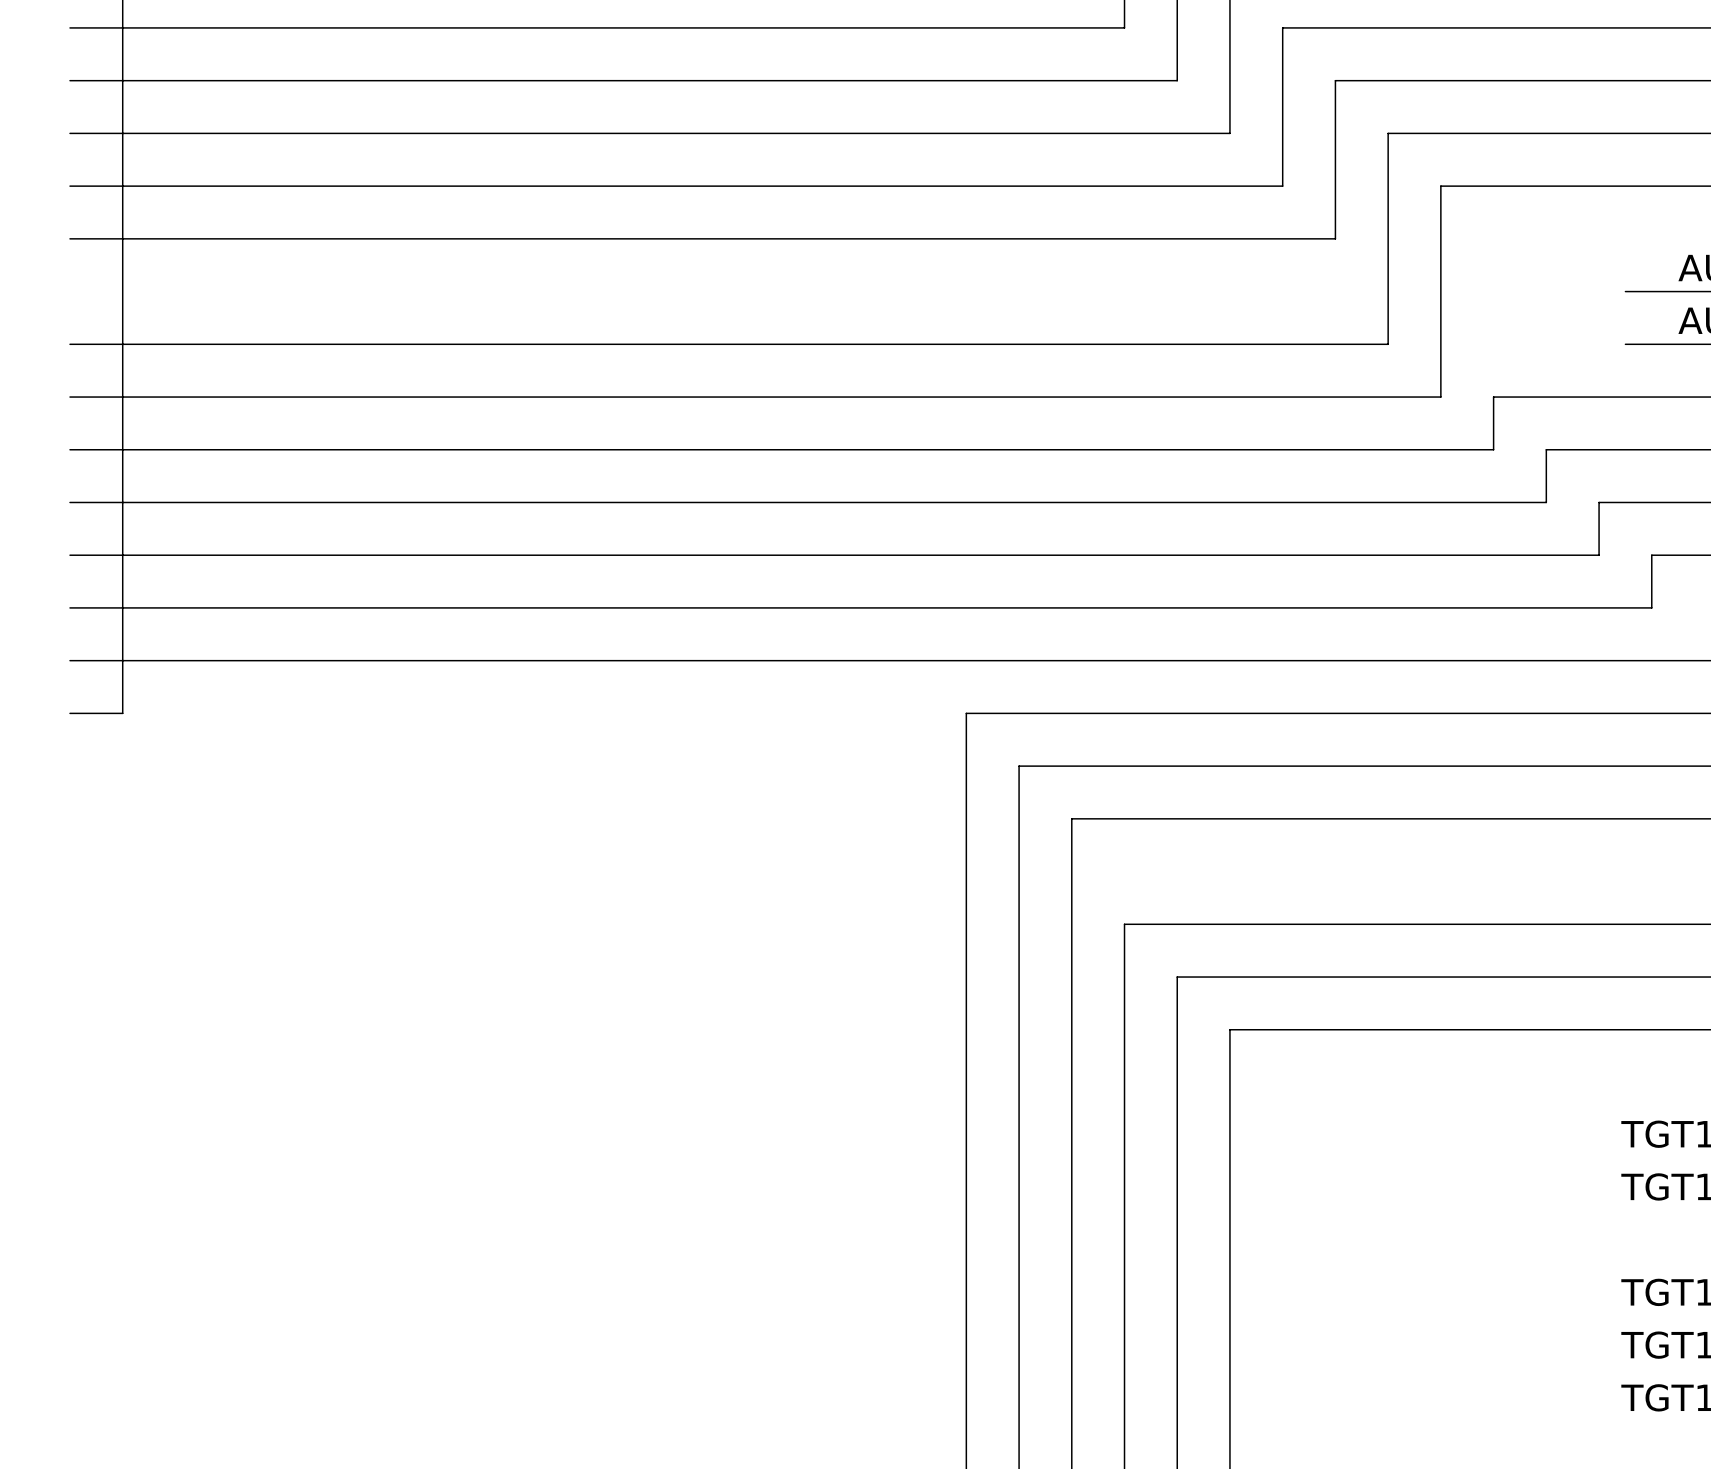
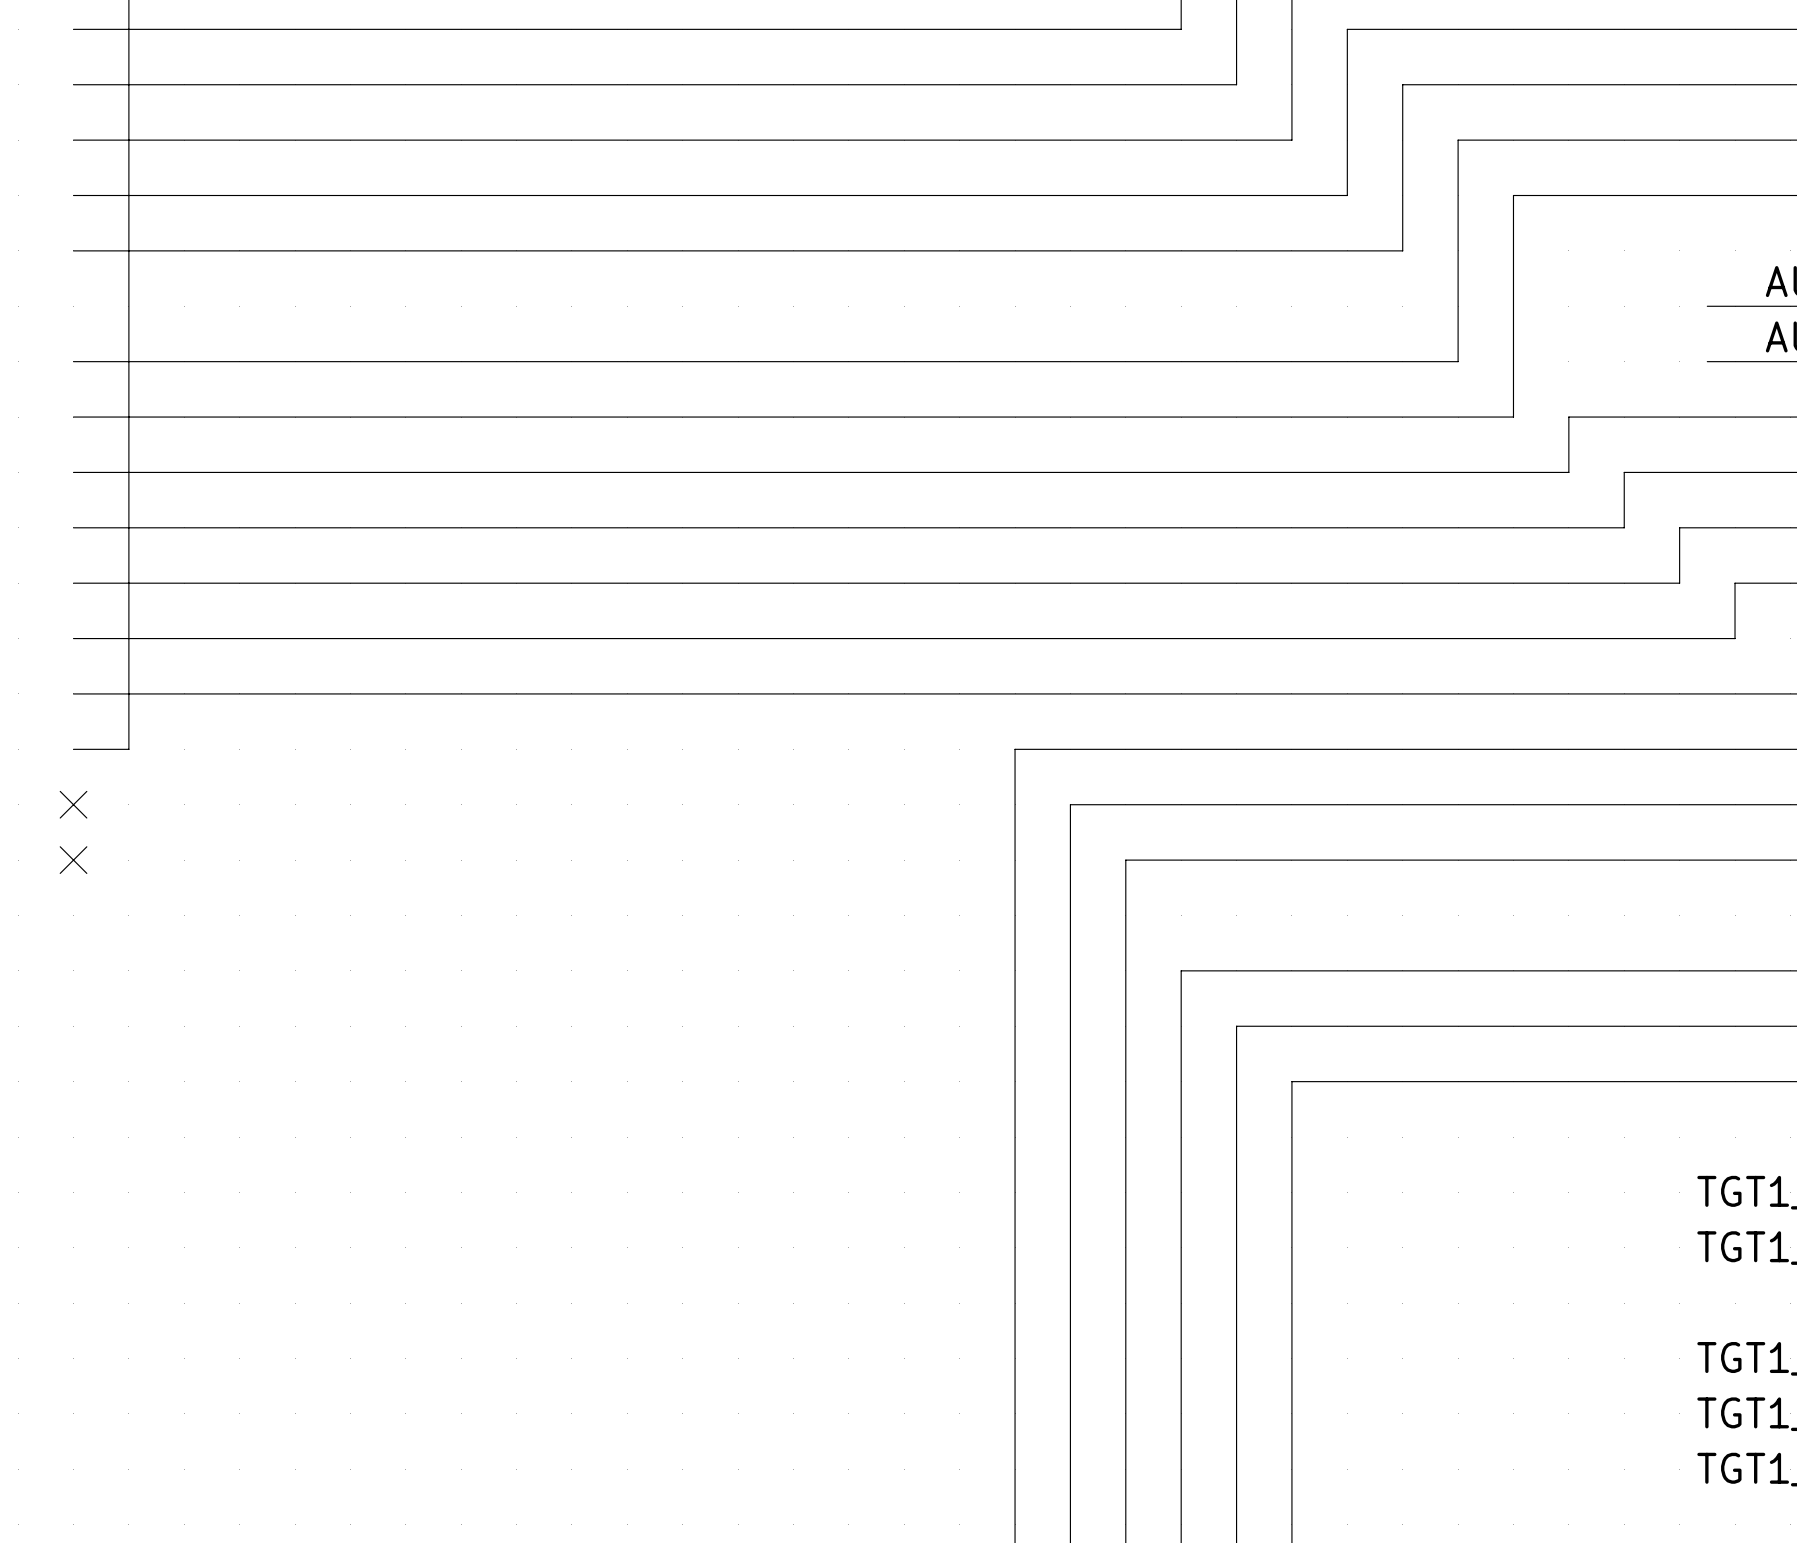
no-connect mark: none -> (73, 804)
no-connect mark: none -> (73, 860)

